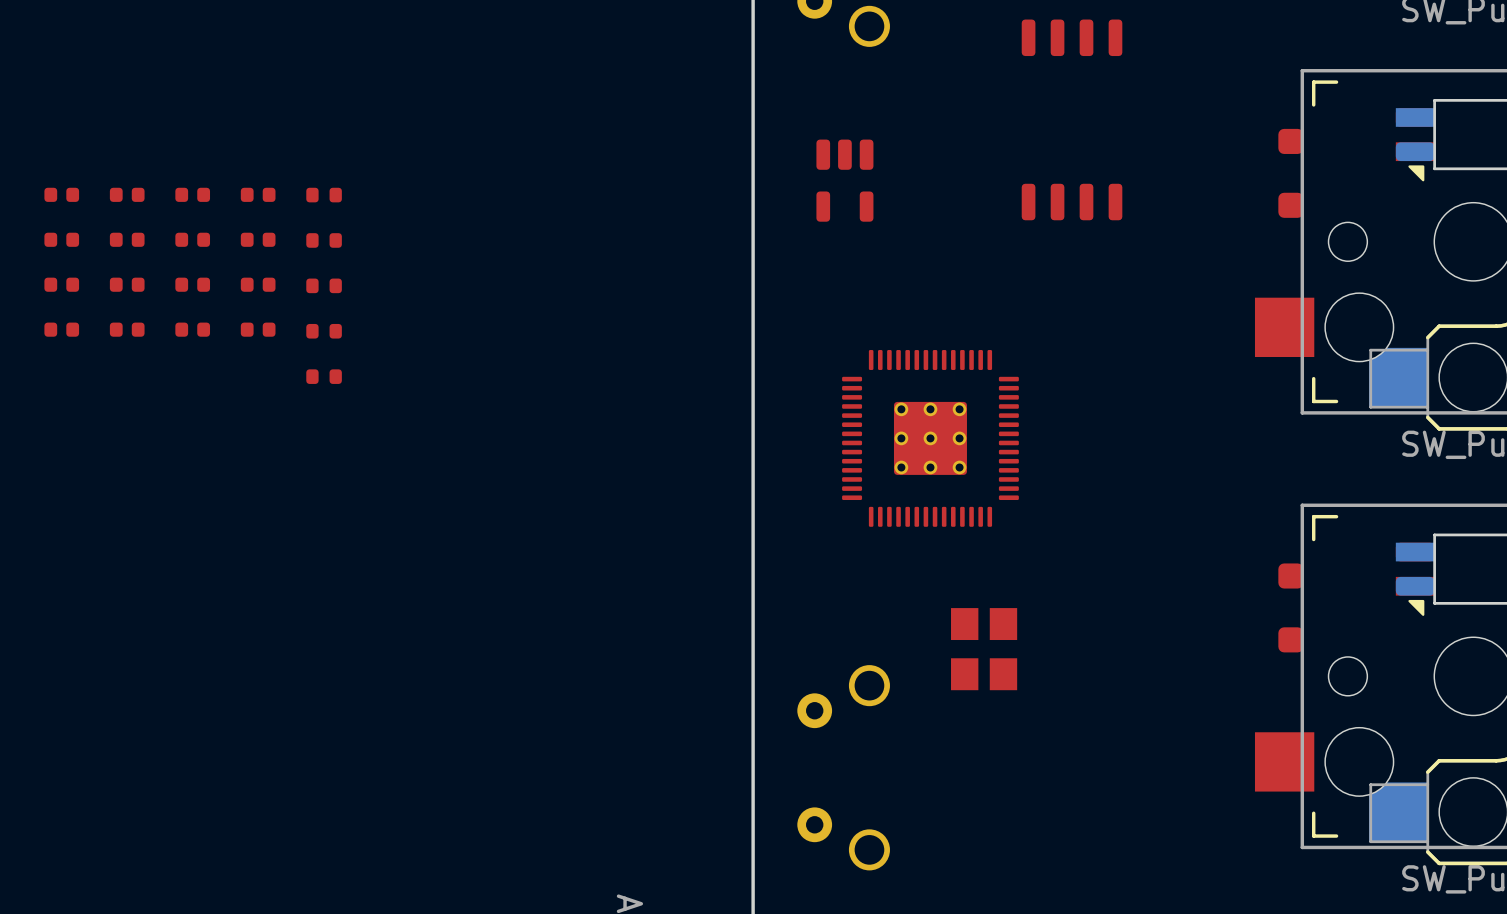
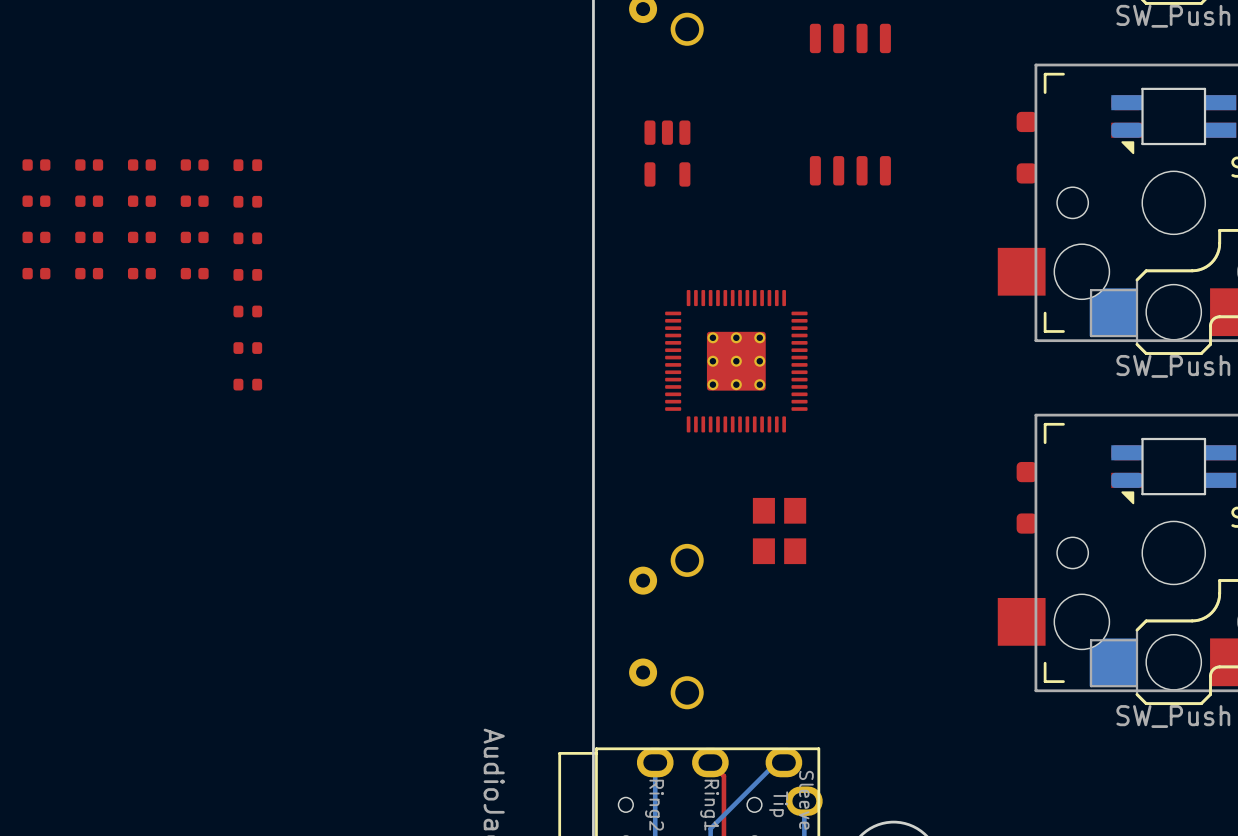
part: none -> (247, 348)
part: none -> (247, 384)

